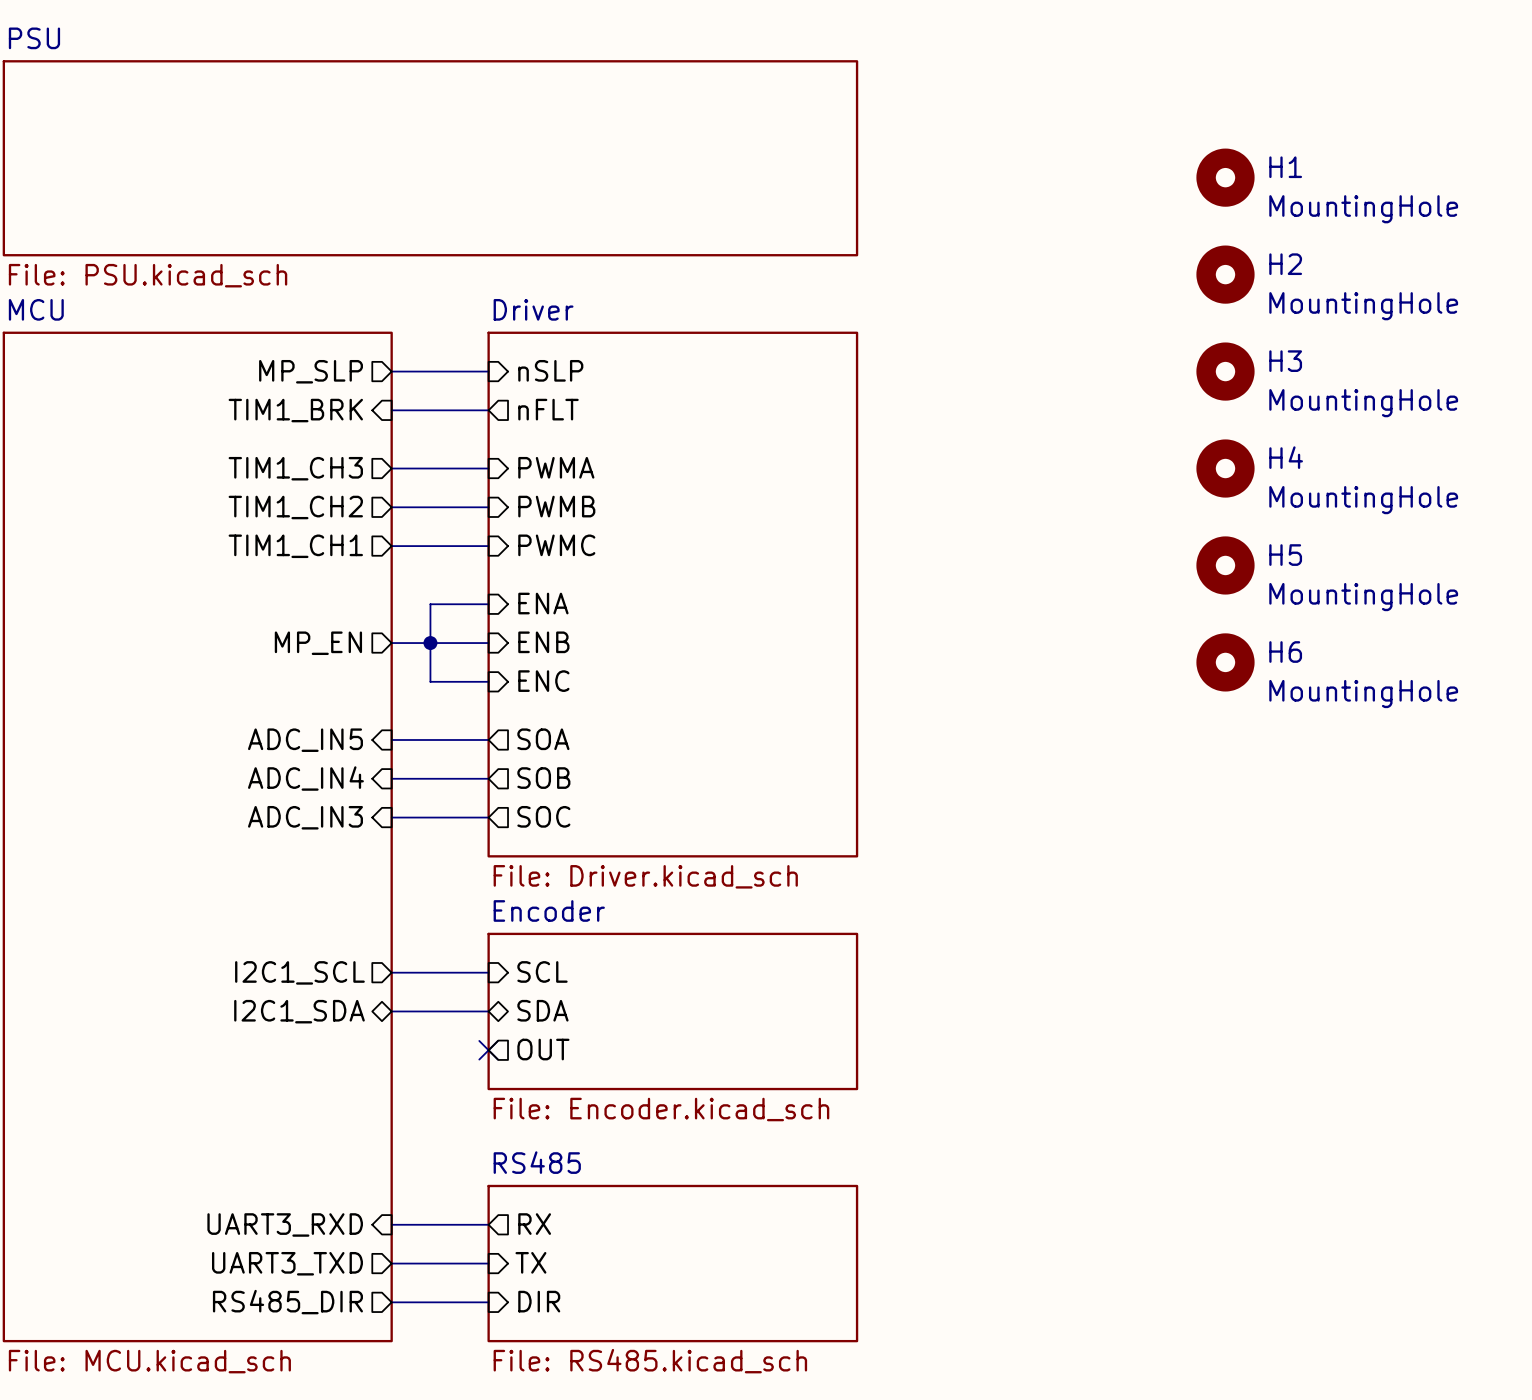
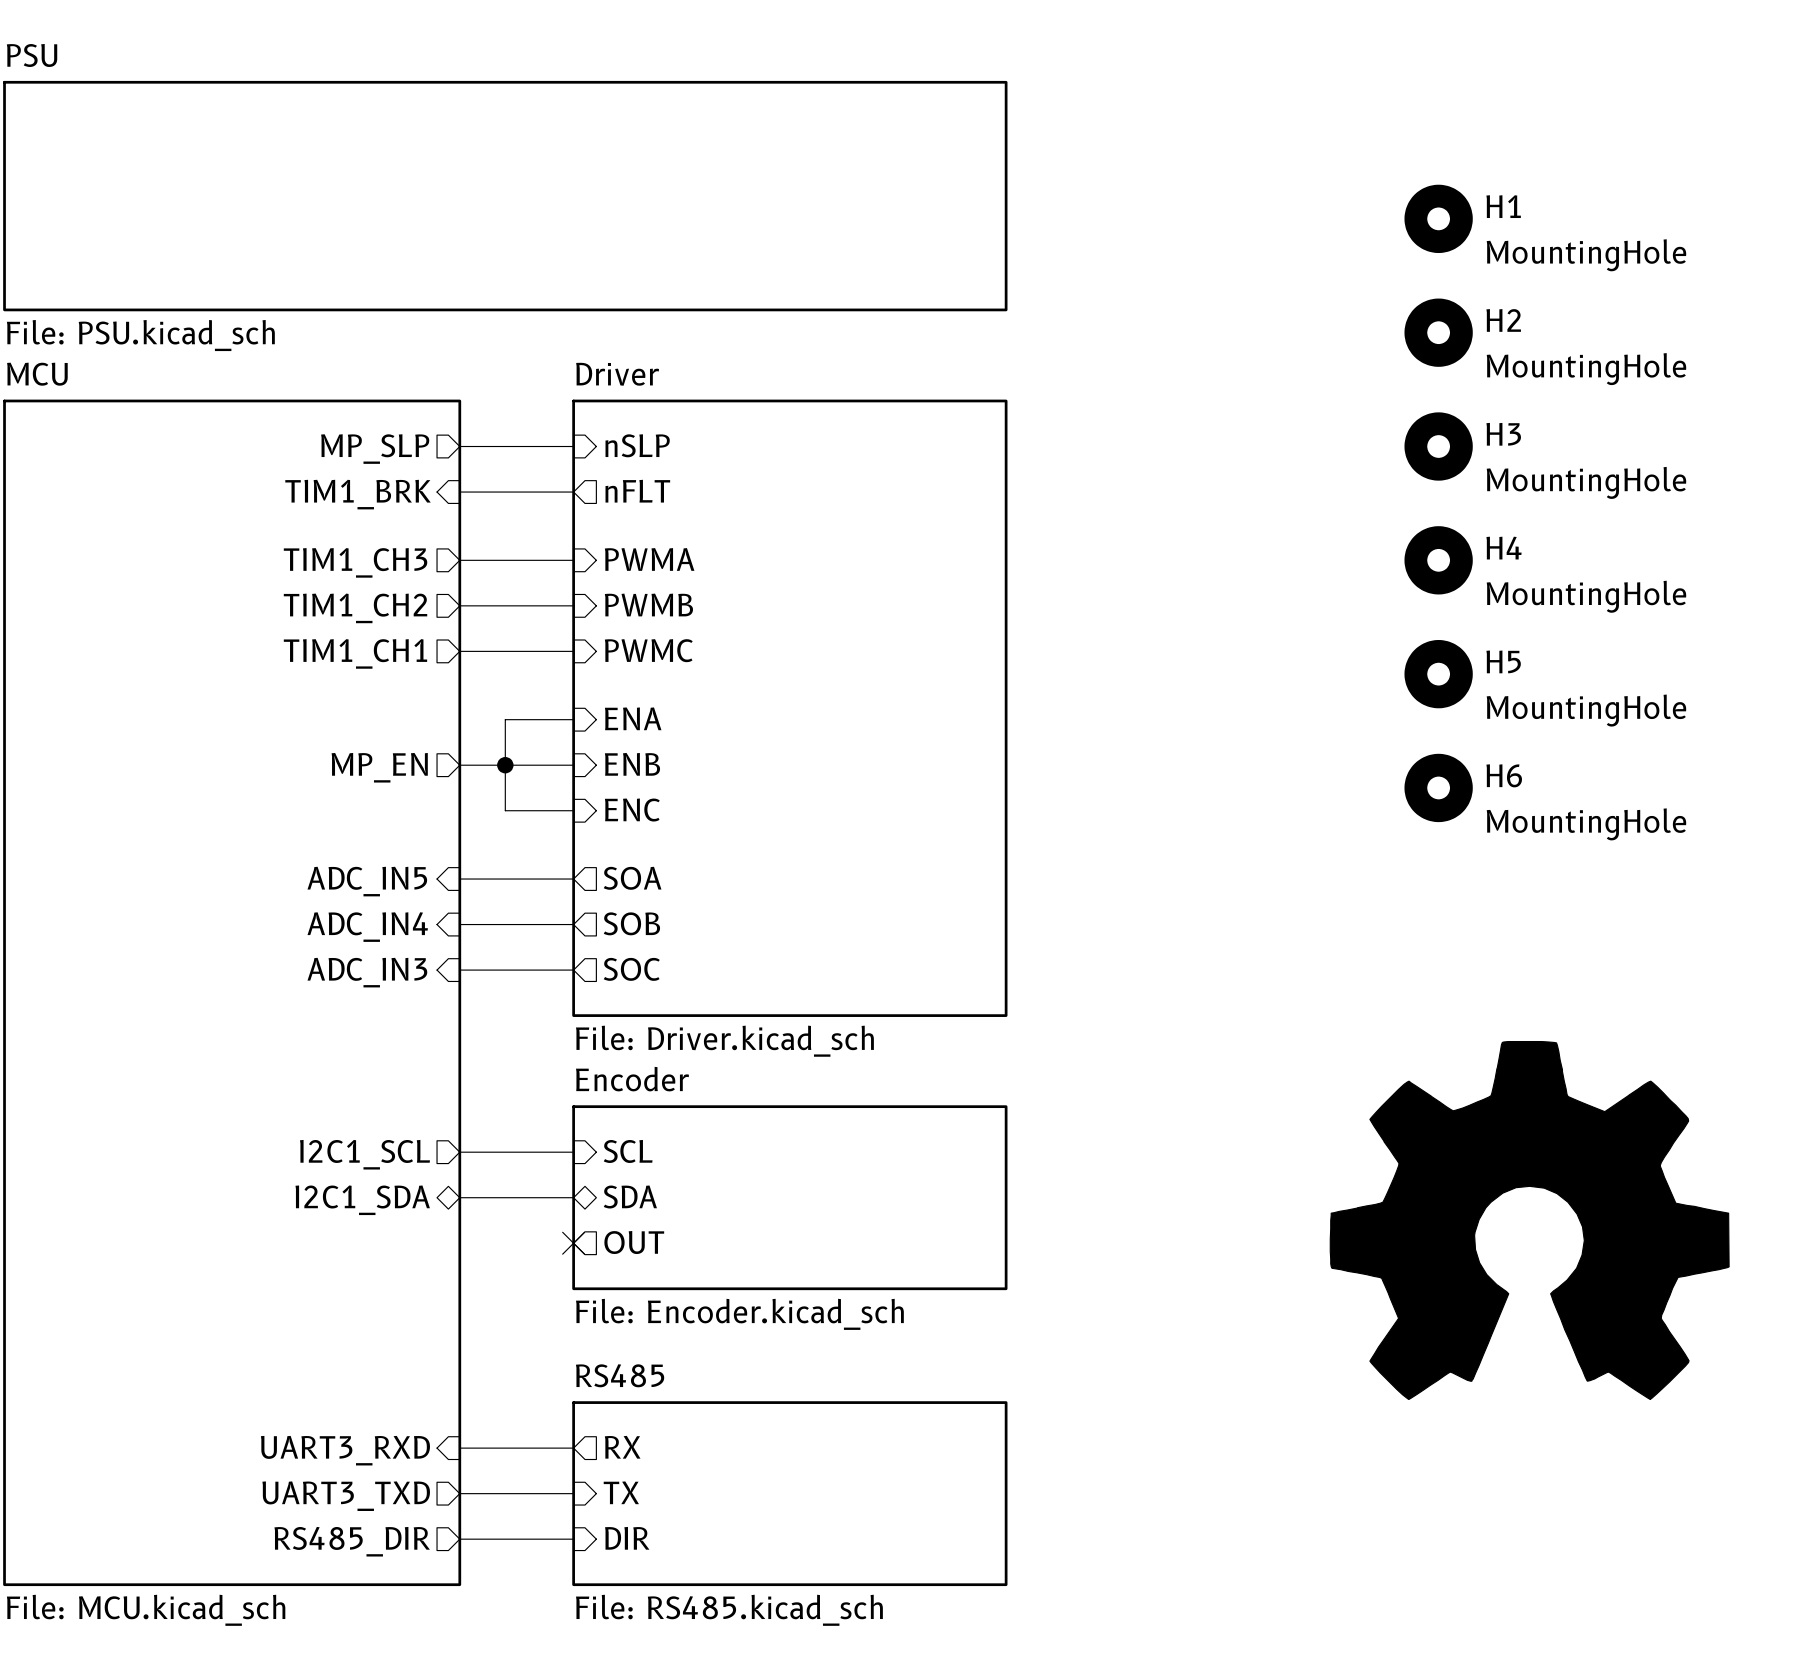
power symbol: none -> (1529, 1220)

